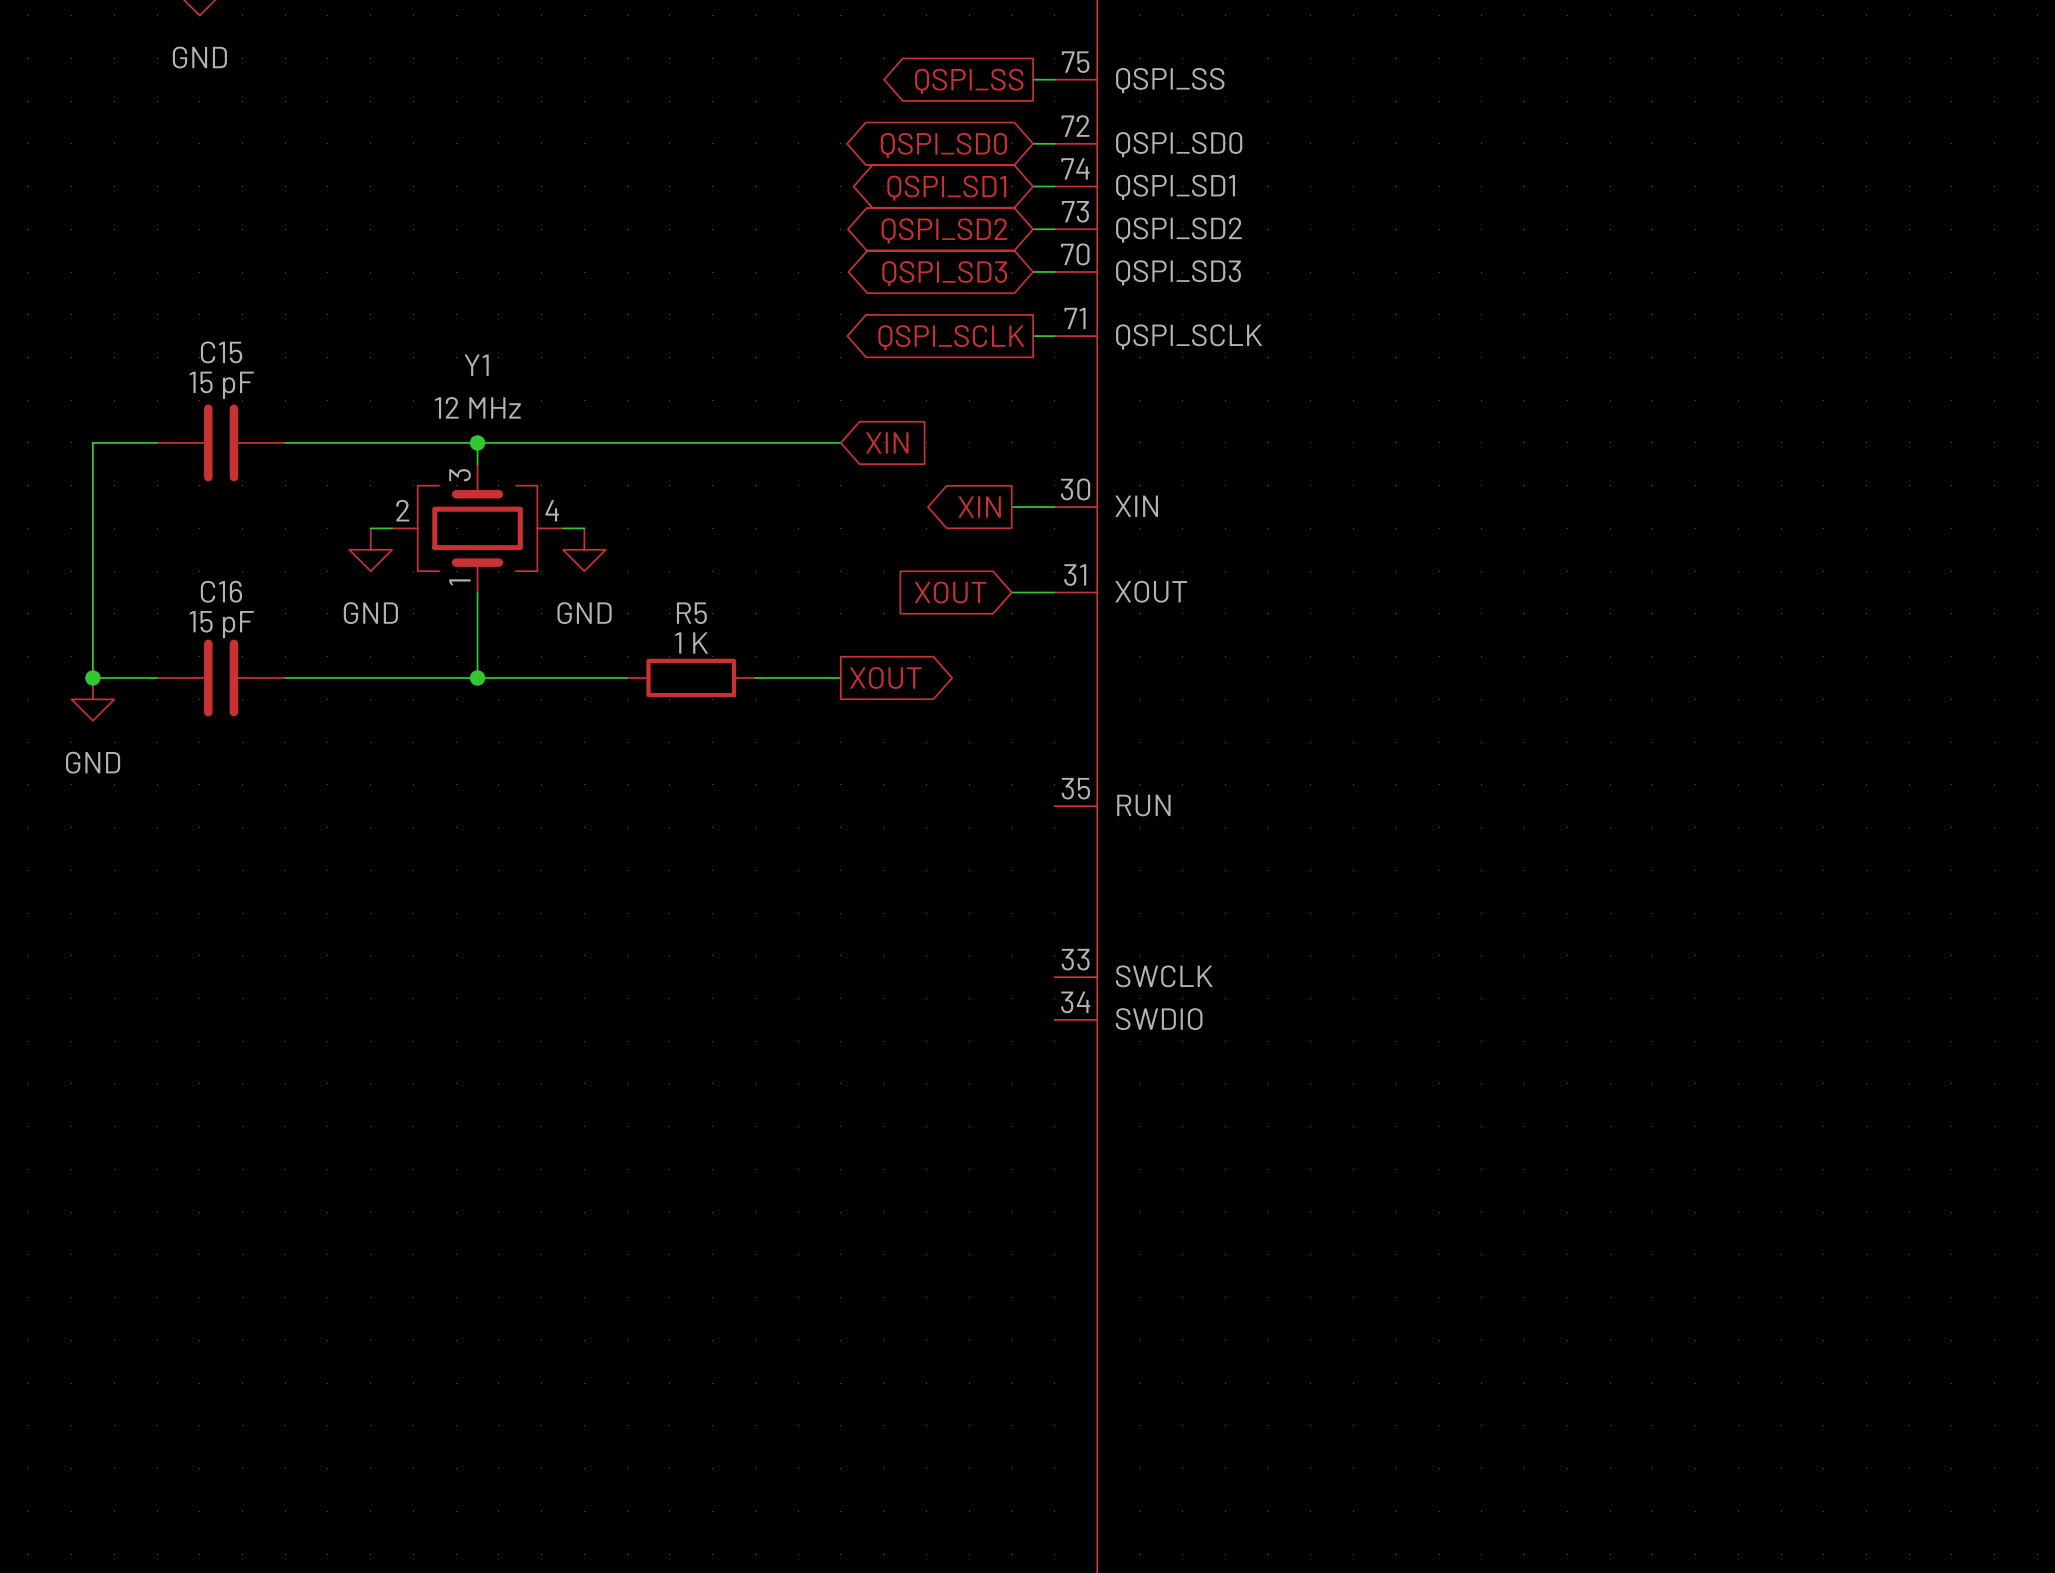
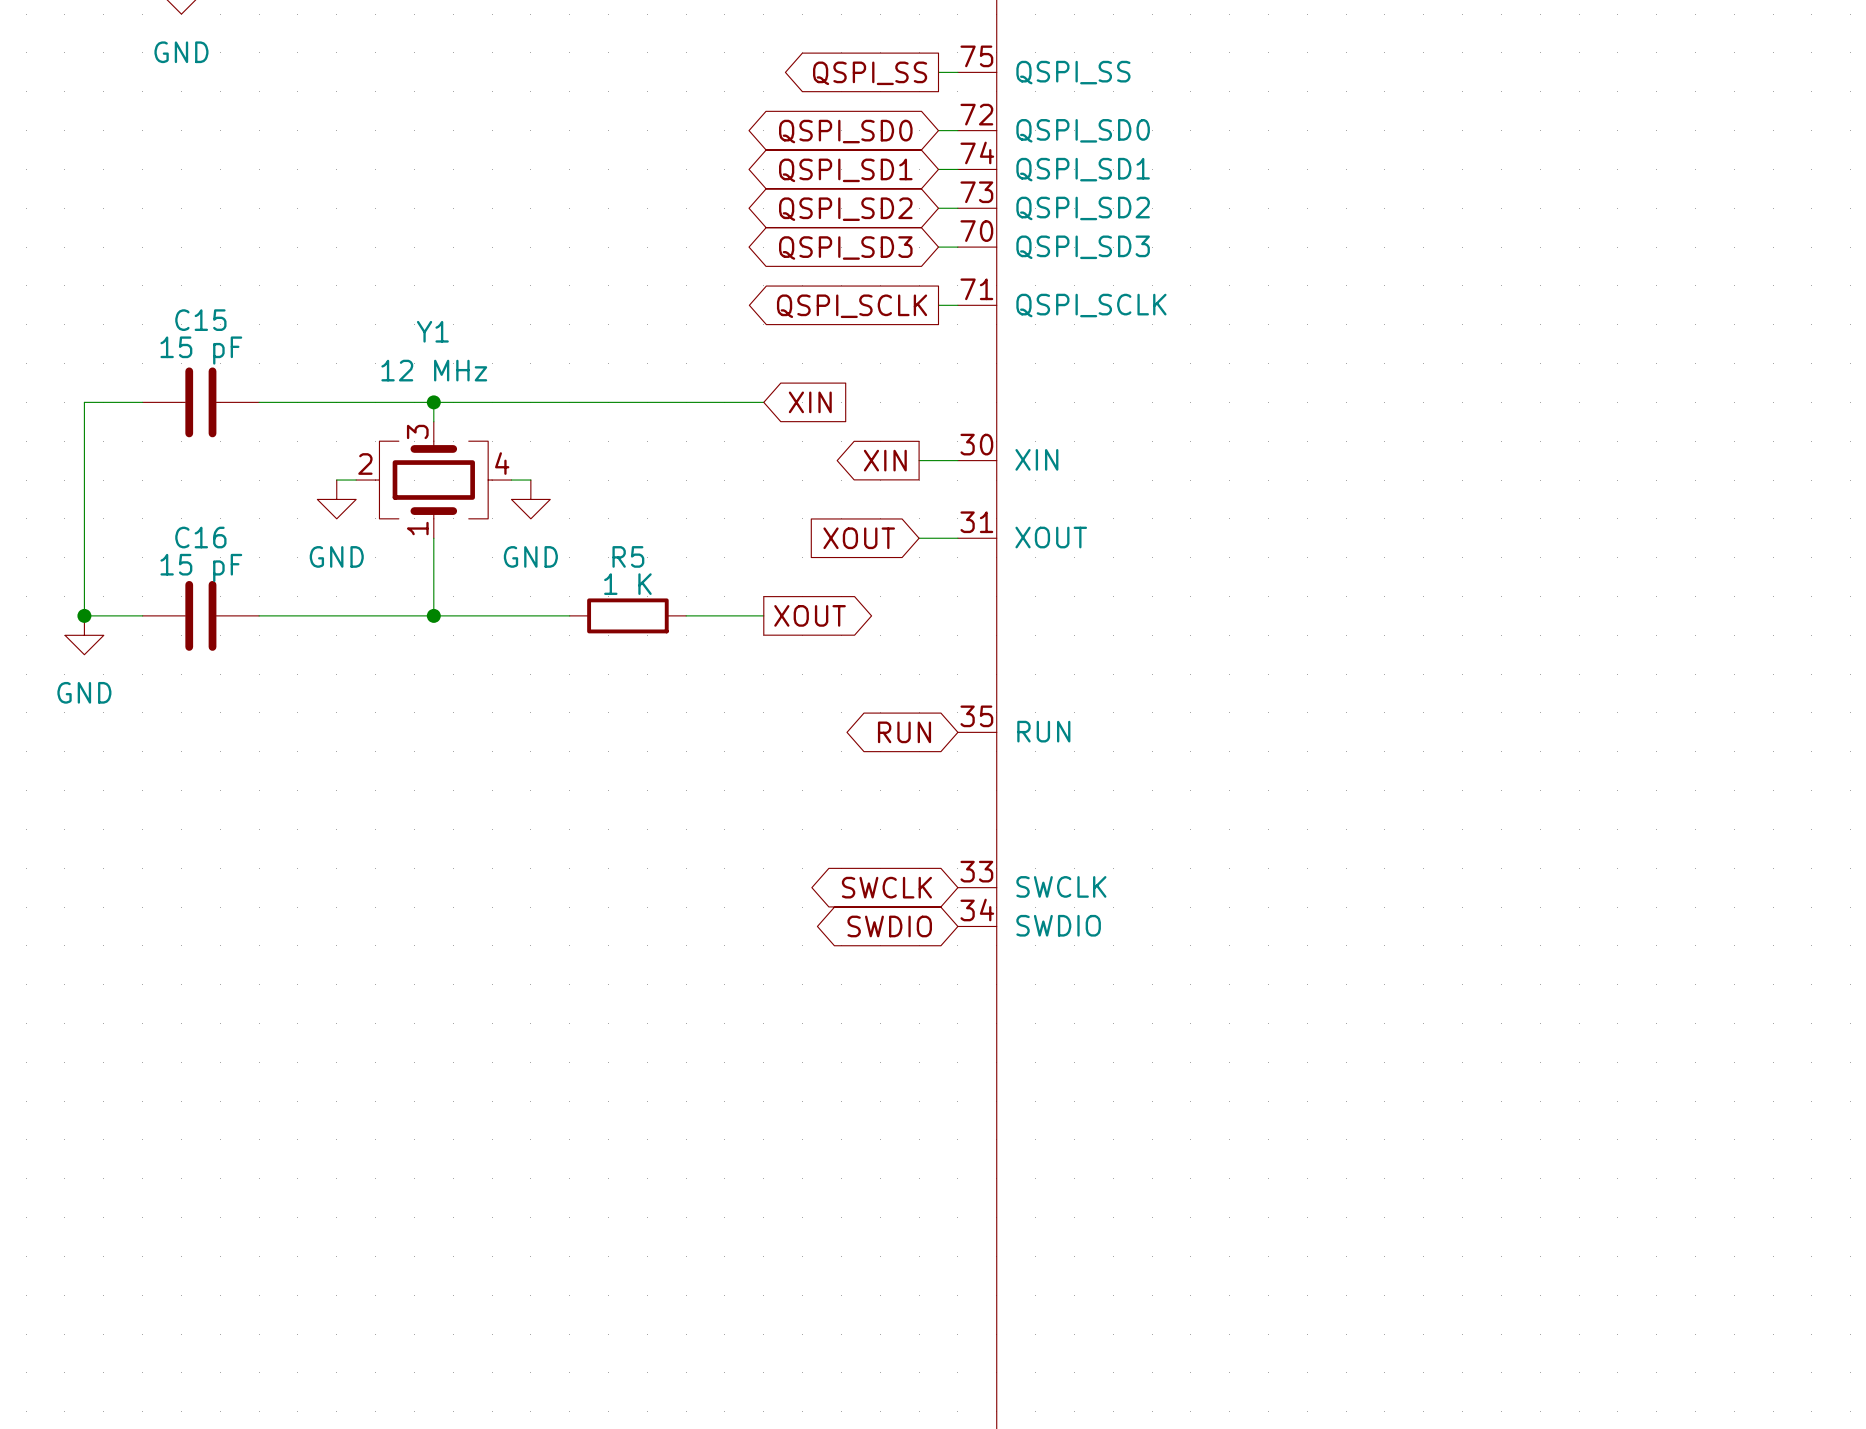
global label: none -> RUN (904, 732)
global label: none -> SWCLK (886, 887)
global label: none -> SWDIO (889, 926)

